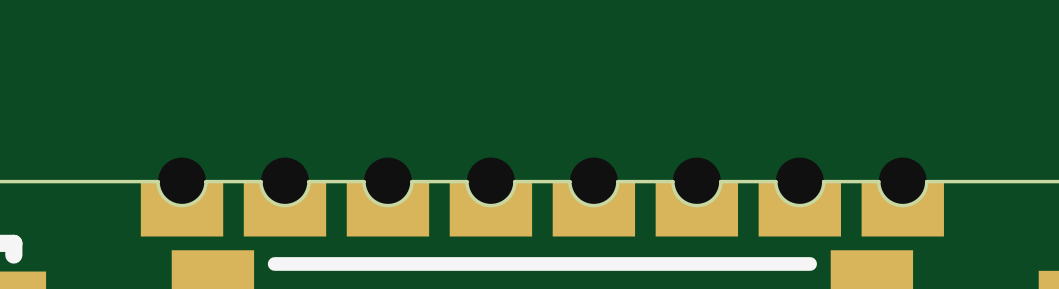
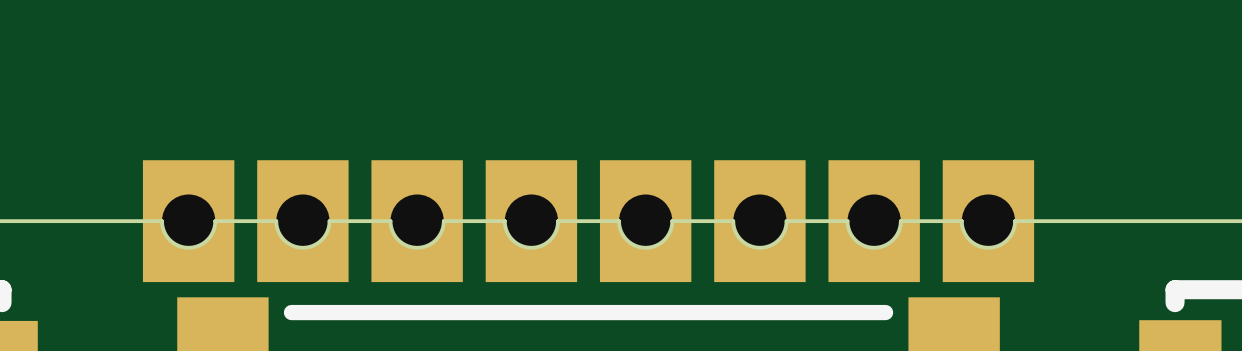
part footprint: [140, 157, 944, 237] -> [142, 160, 1035, 283]

